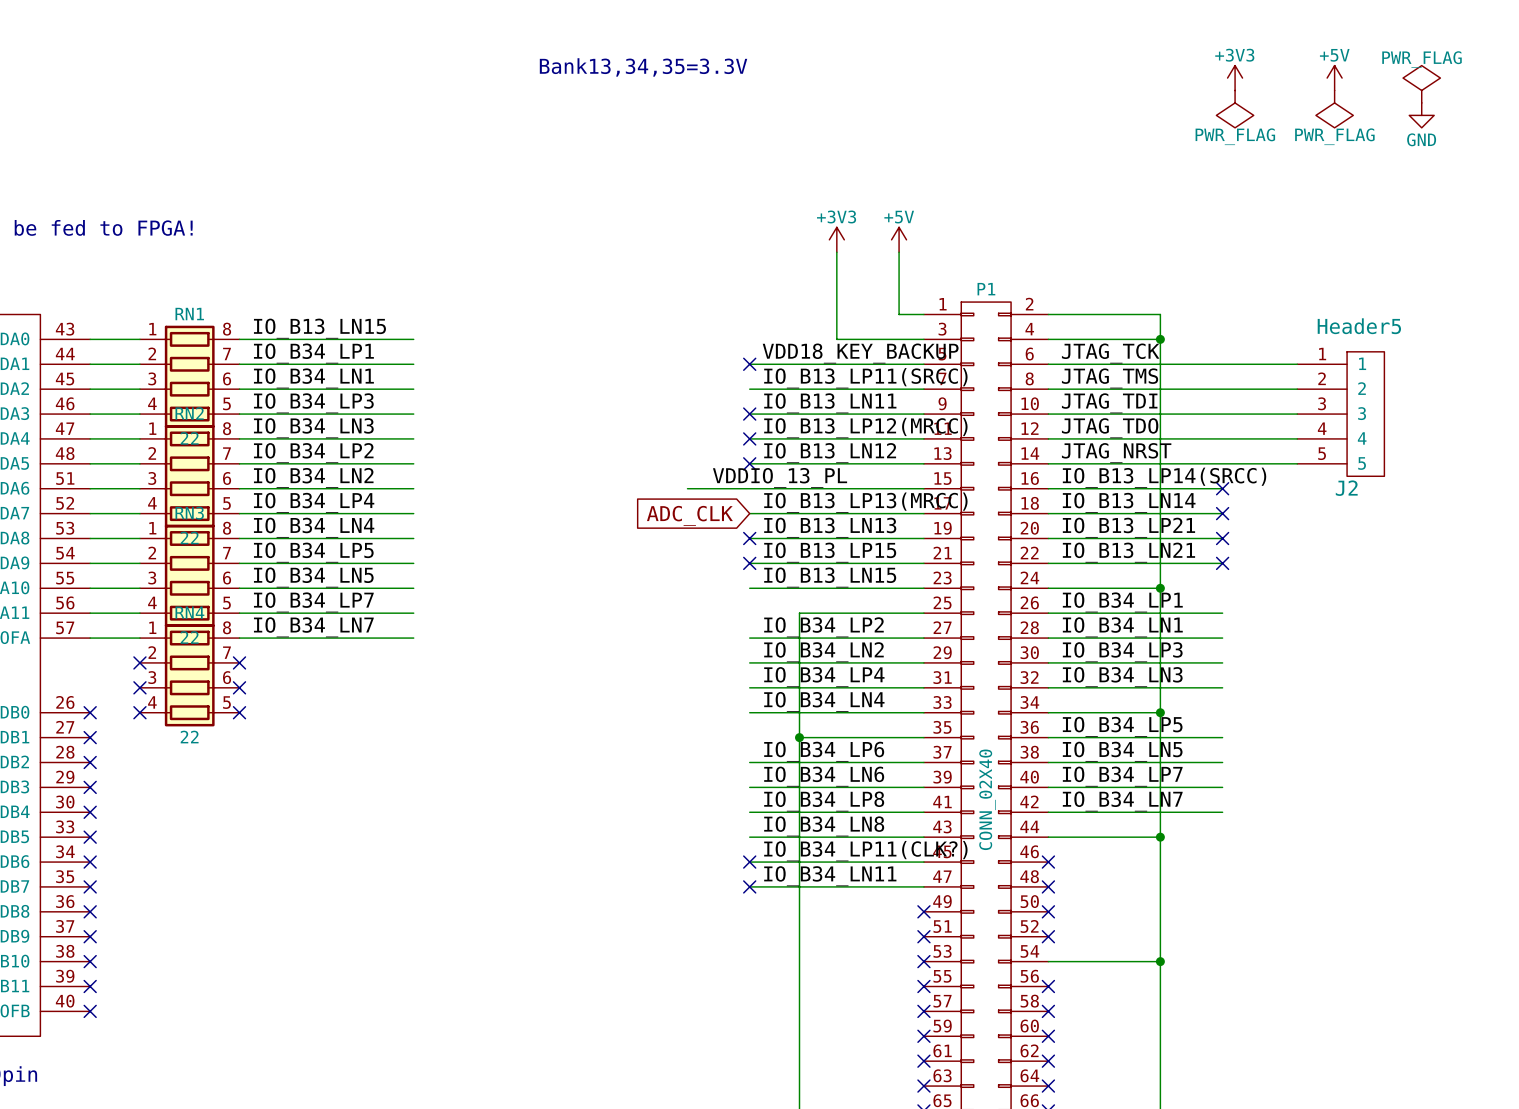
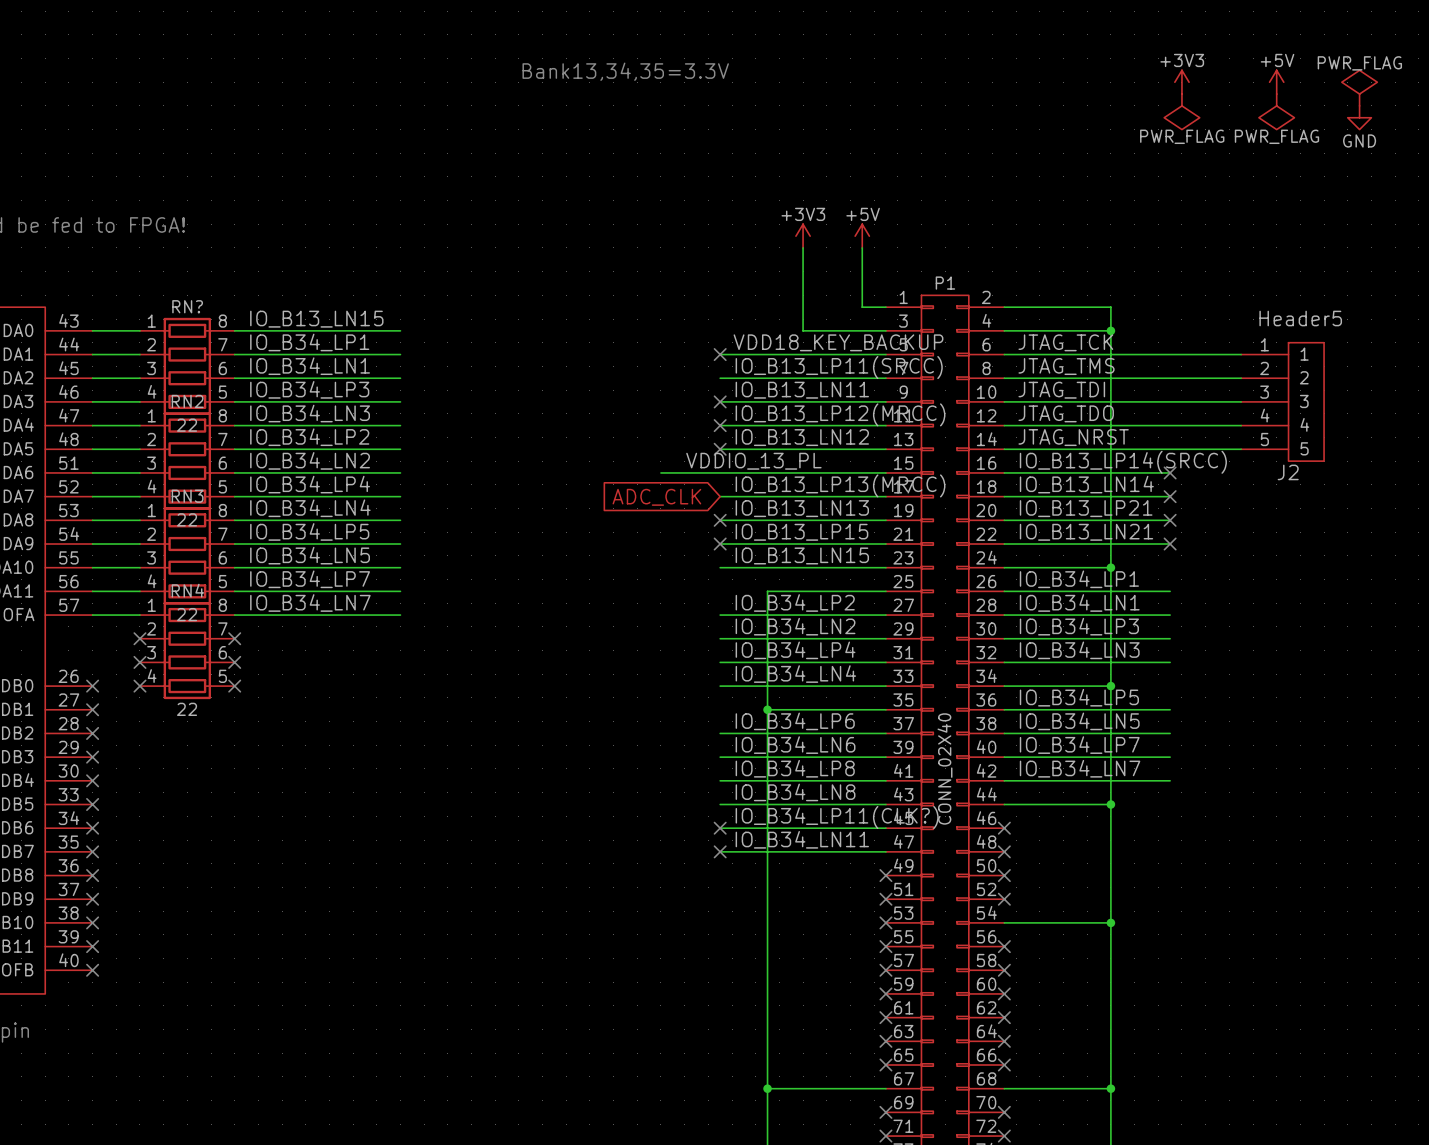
RN1 name: RN1 (189, 314) -> RN? (187, 306)

